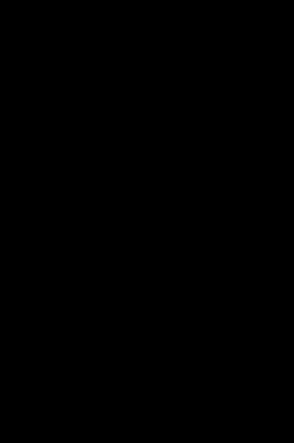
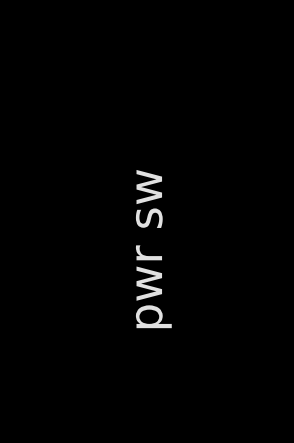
text: none -> pwr sw (153, 249)

